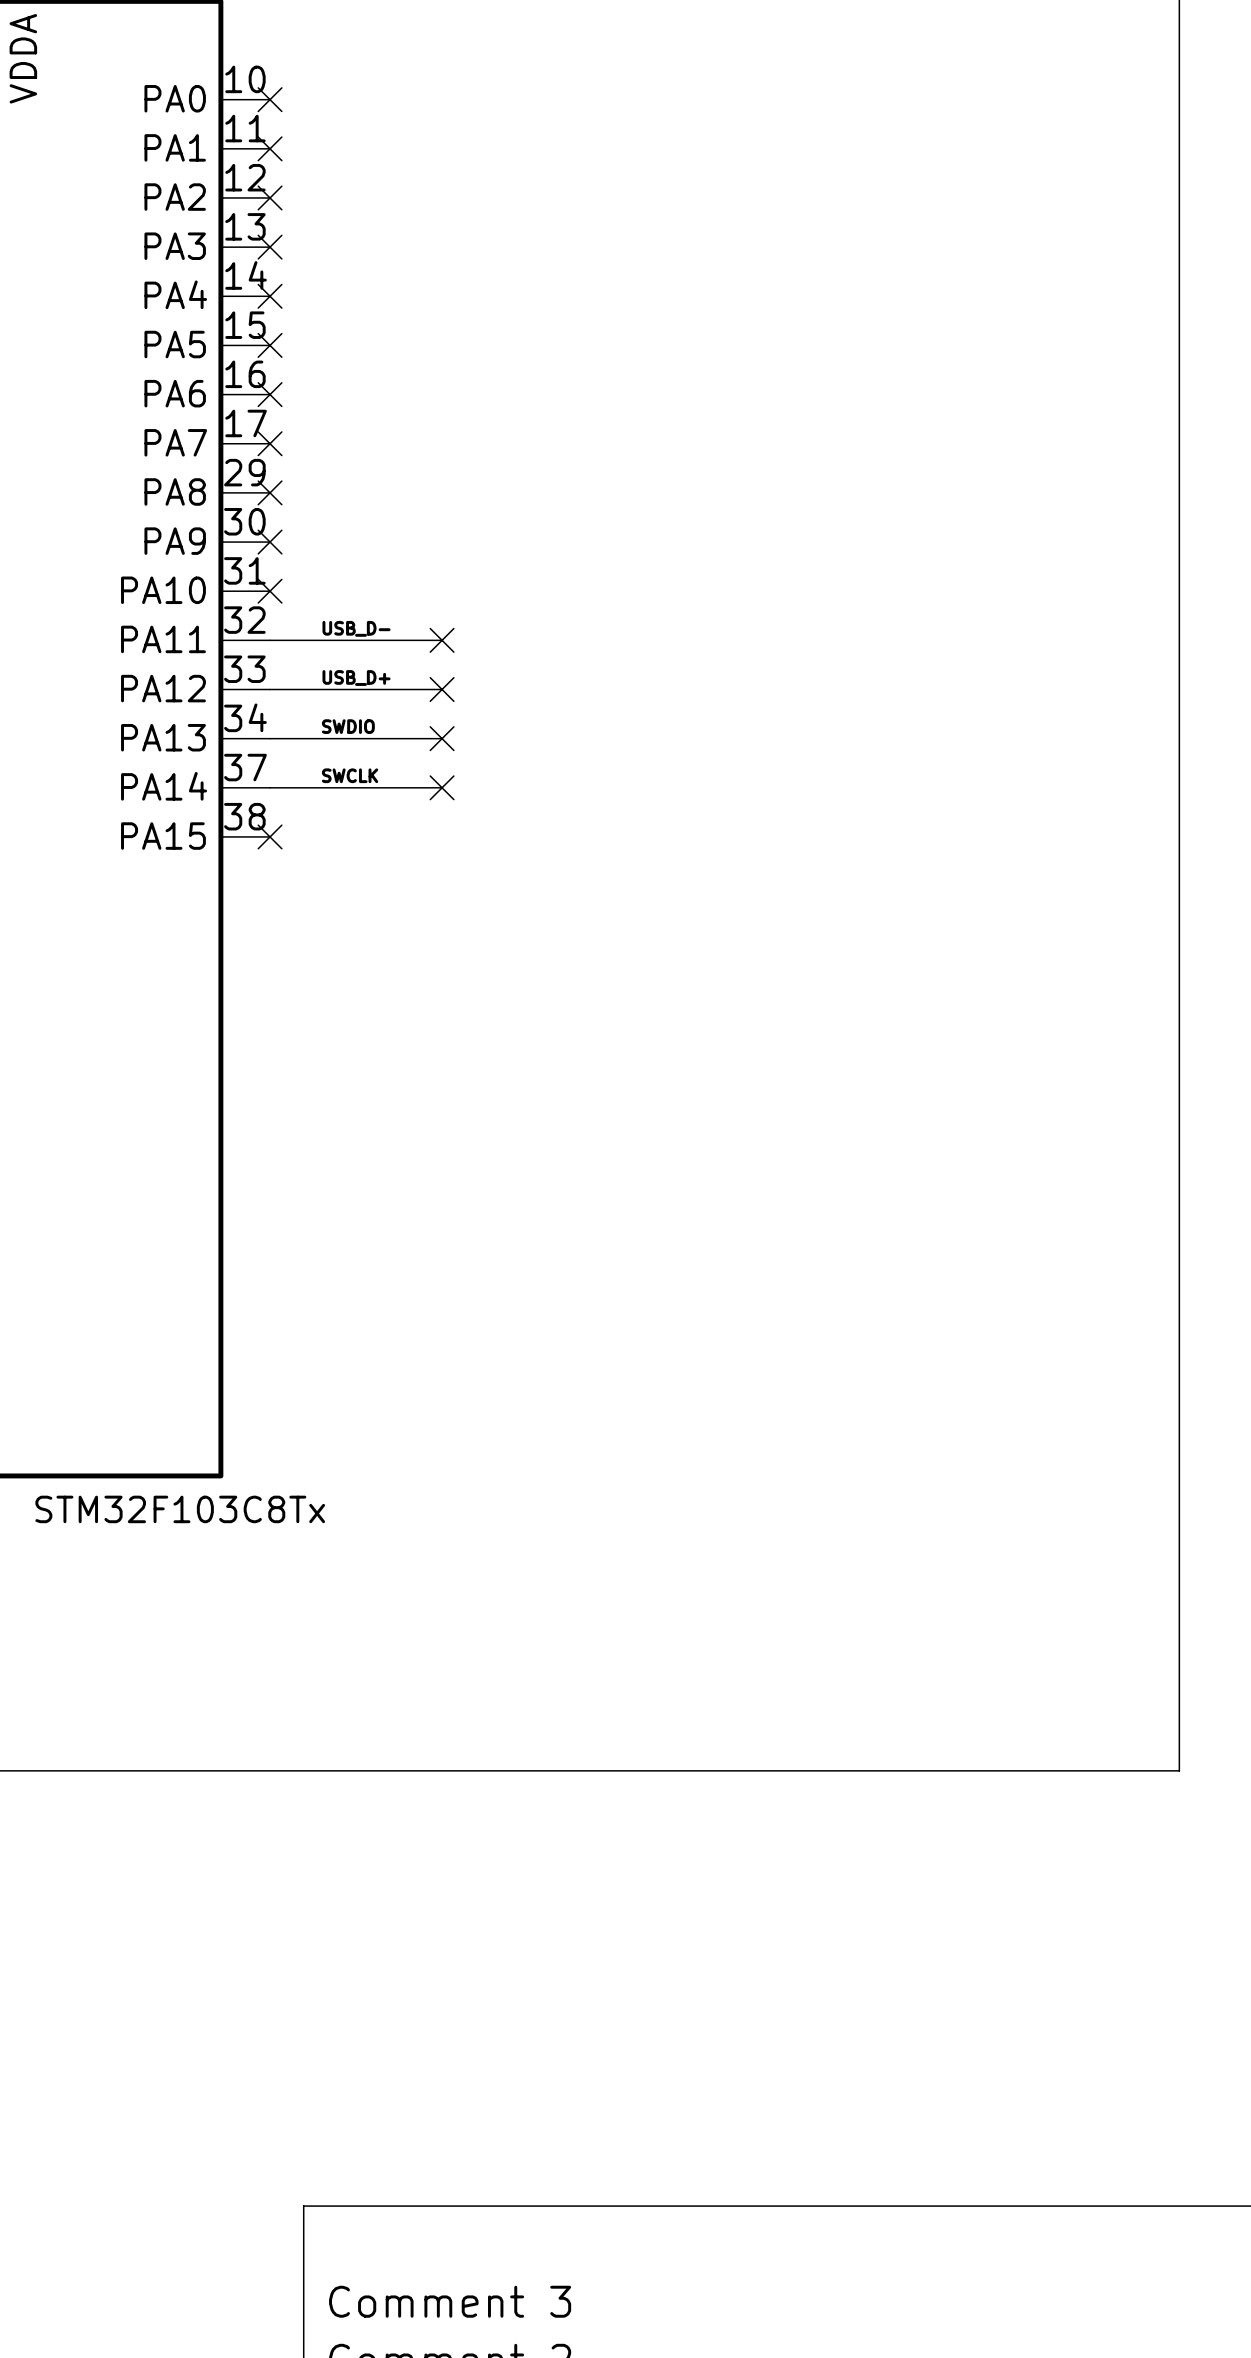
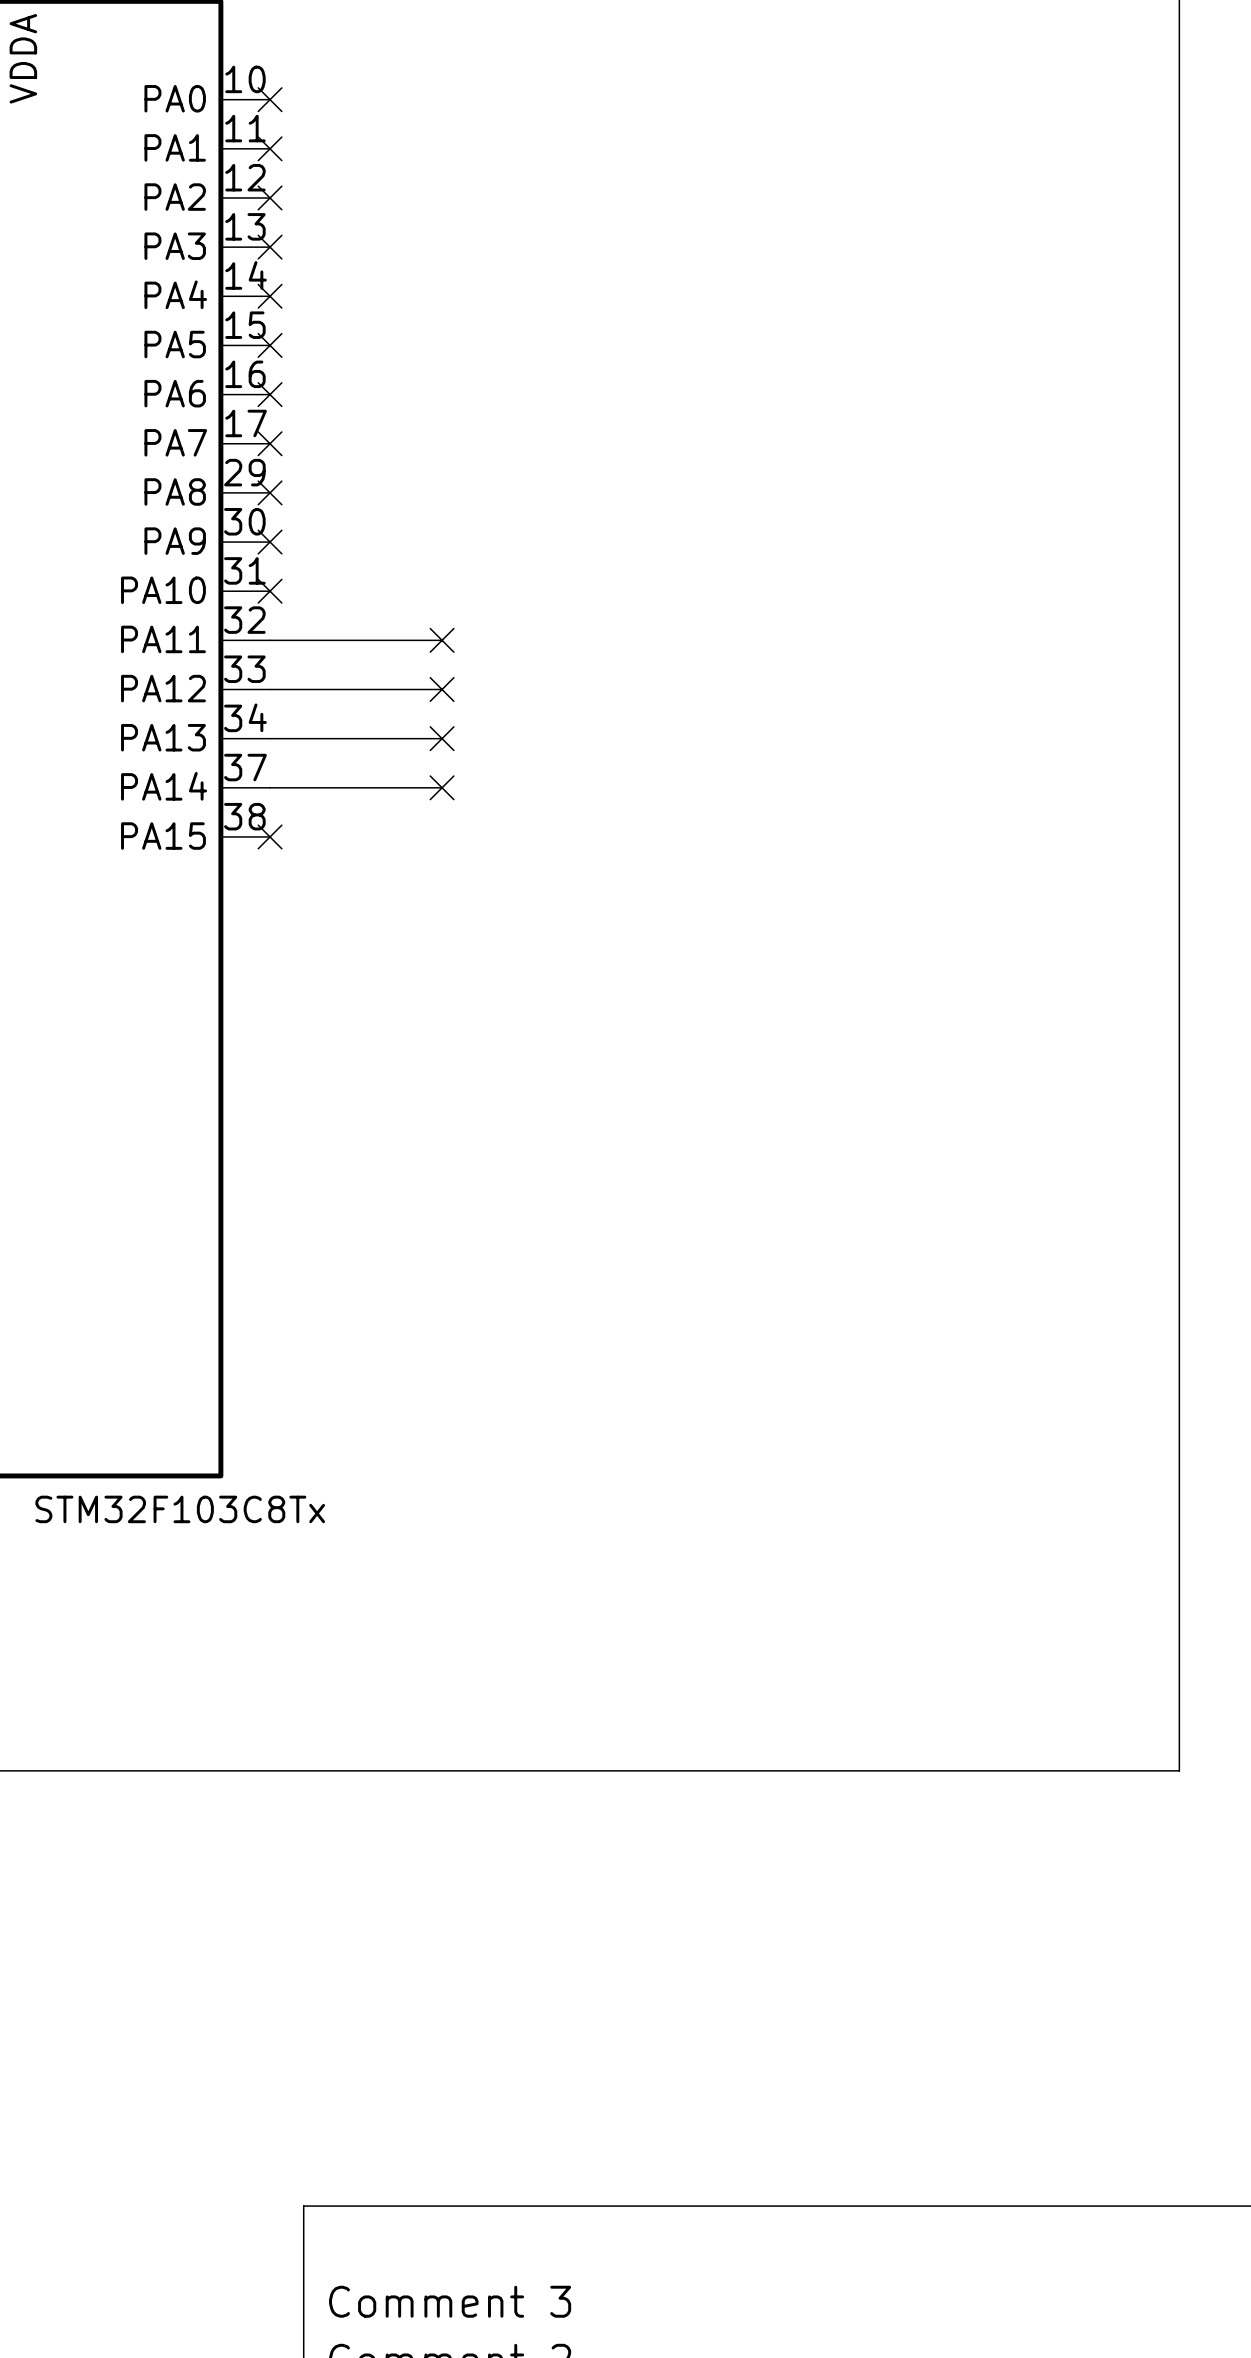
label: USB_D- (356, 628) -> none
label: USB_D+ (356, 678) -> none
label: SWDIO (348, 726) -> none
label: SWCLK (350, 775) -> none

